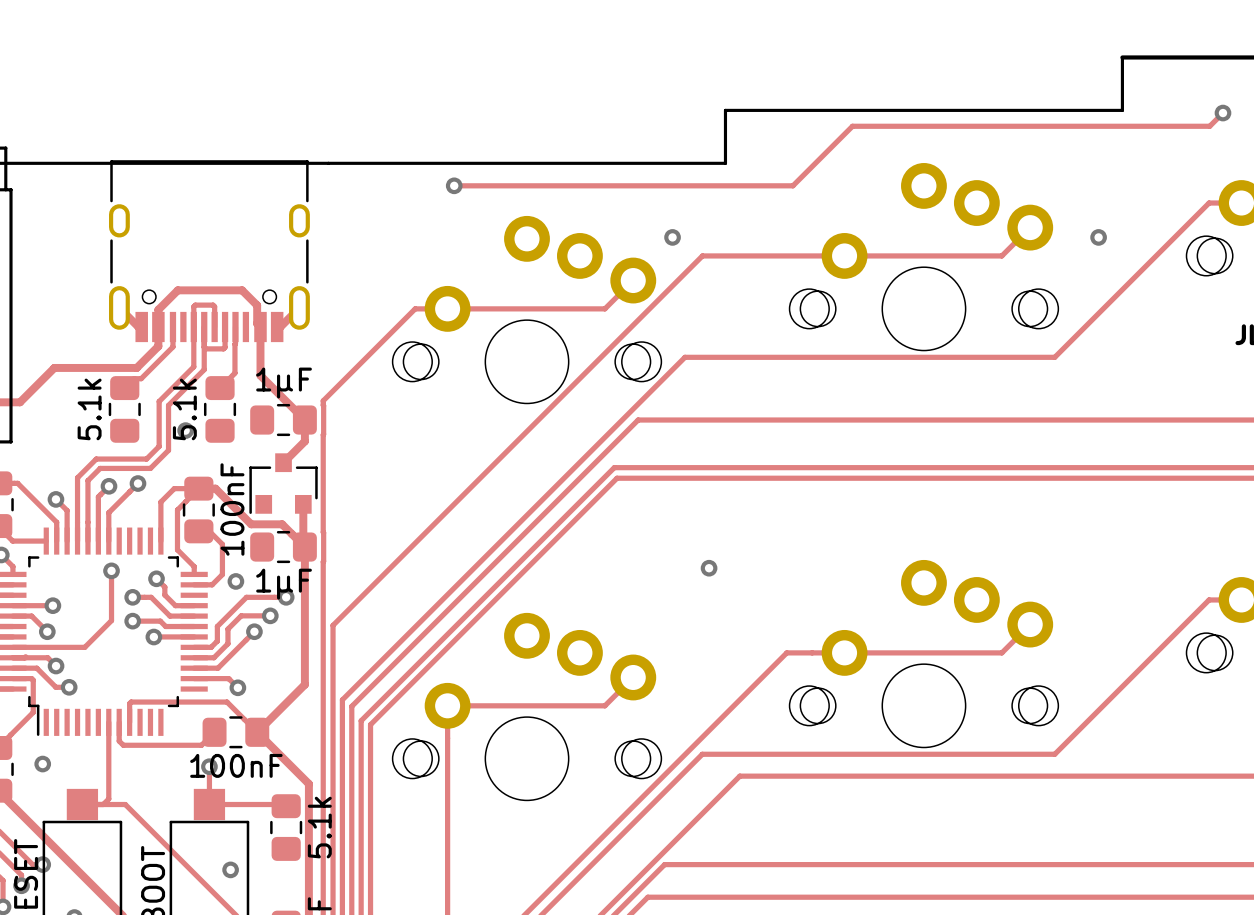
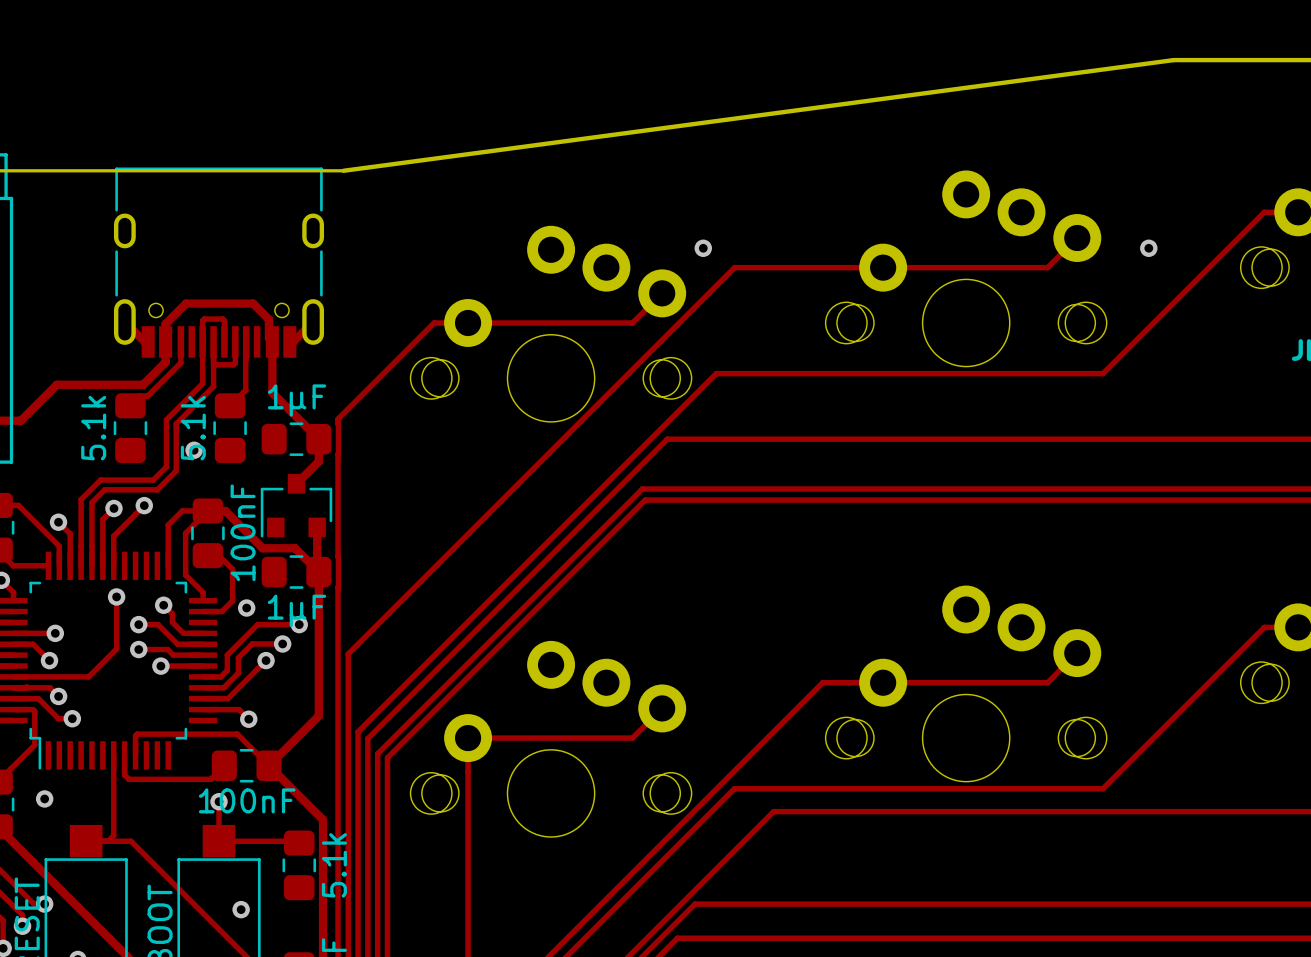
board edge: (1122, 57) (1122, 110) (725, 110) (725, 163) (328, 163) -> (1173, 60) (343, 170)
track: (1222, 113) (1209, 126) (852, 126) (792, 185) (454, 185) -> none
via: (1222, 113) -> none
via: (454, 185) -> none
via: (709, 568) -> none

